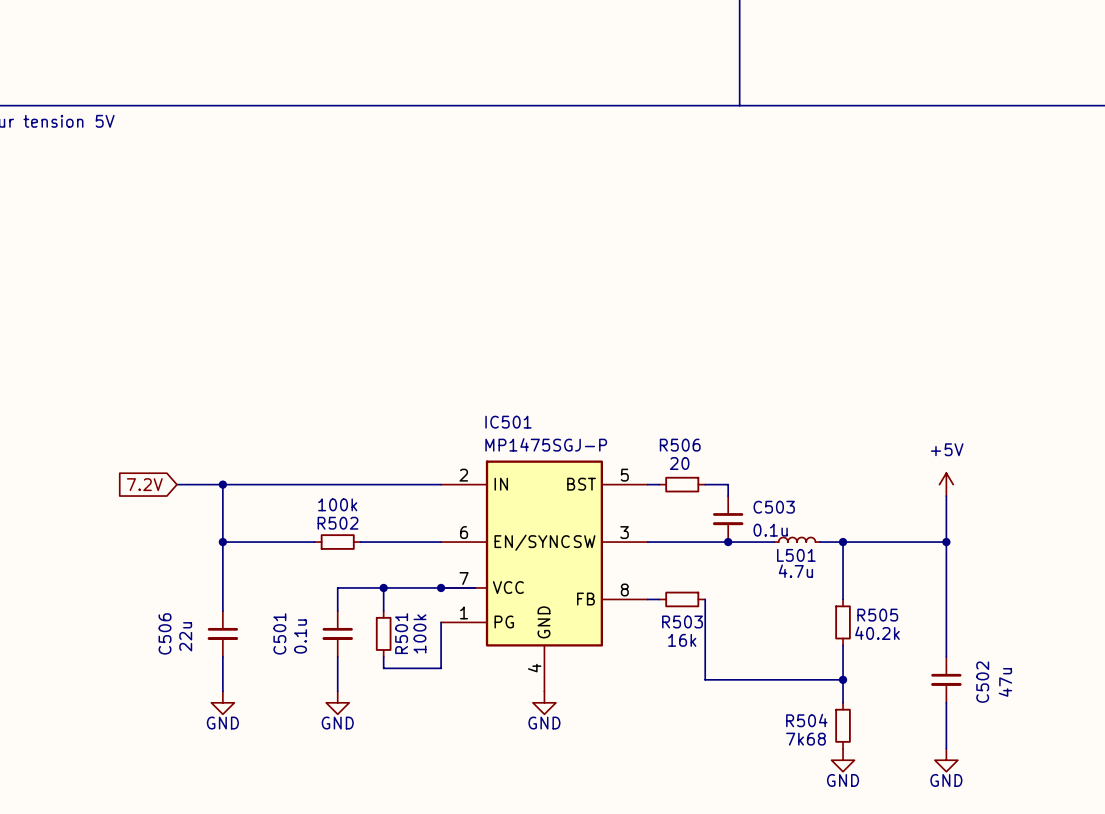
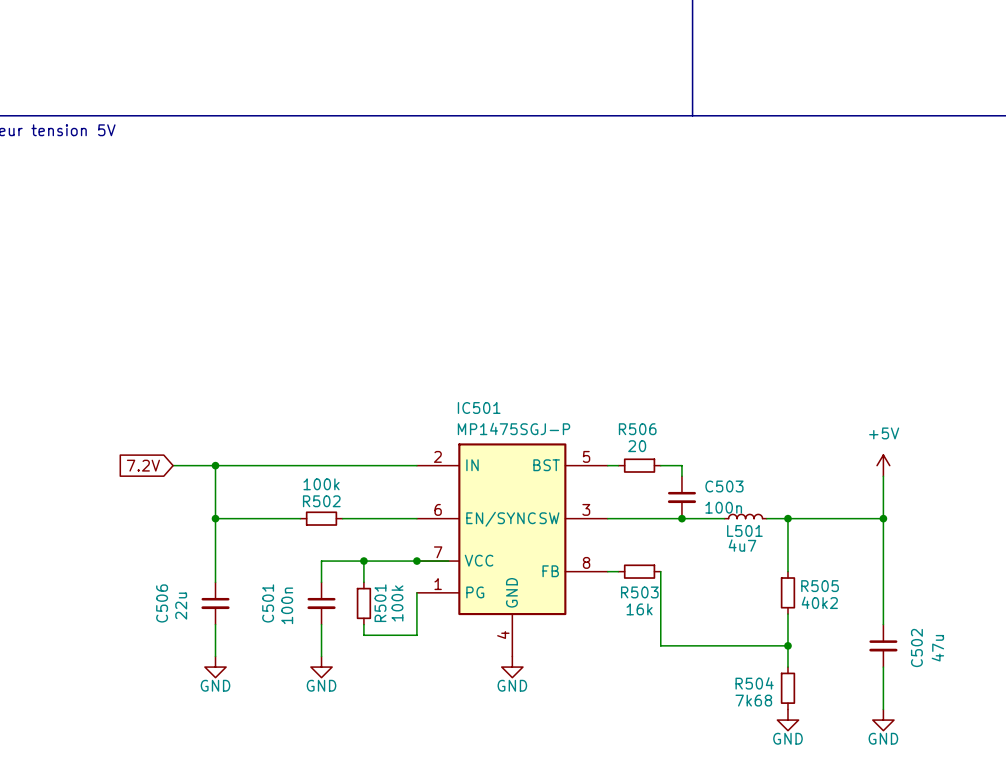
C503 value: 0.1u (770, 530) -> 100n (723, 507)
L501 value: 4.7u (795, 571) -> 4u7 (742, 545)
R505 value: 40.2k (877, 633) -> 40k2 (819, 602)
C501 value: 0.1u (300, 636) -> 100n (287, 605)

